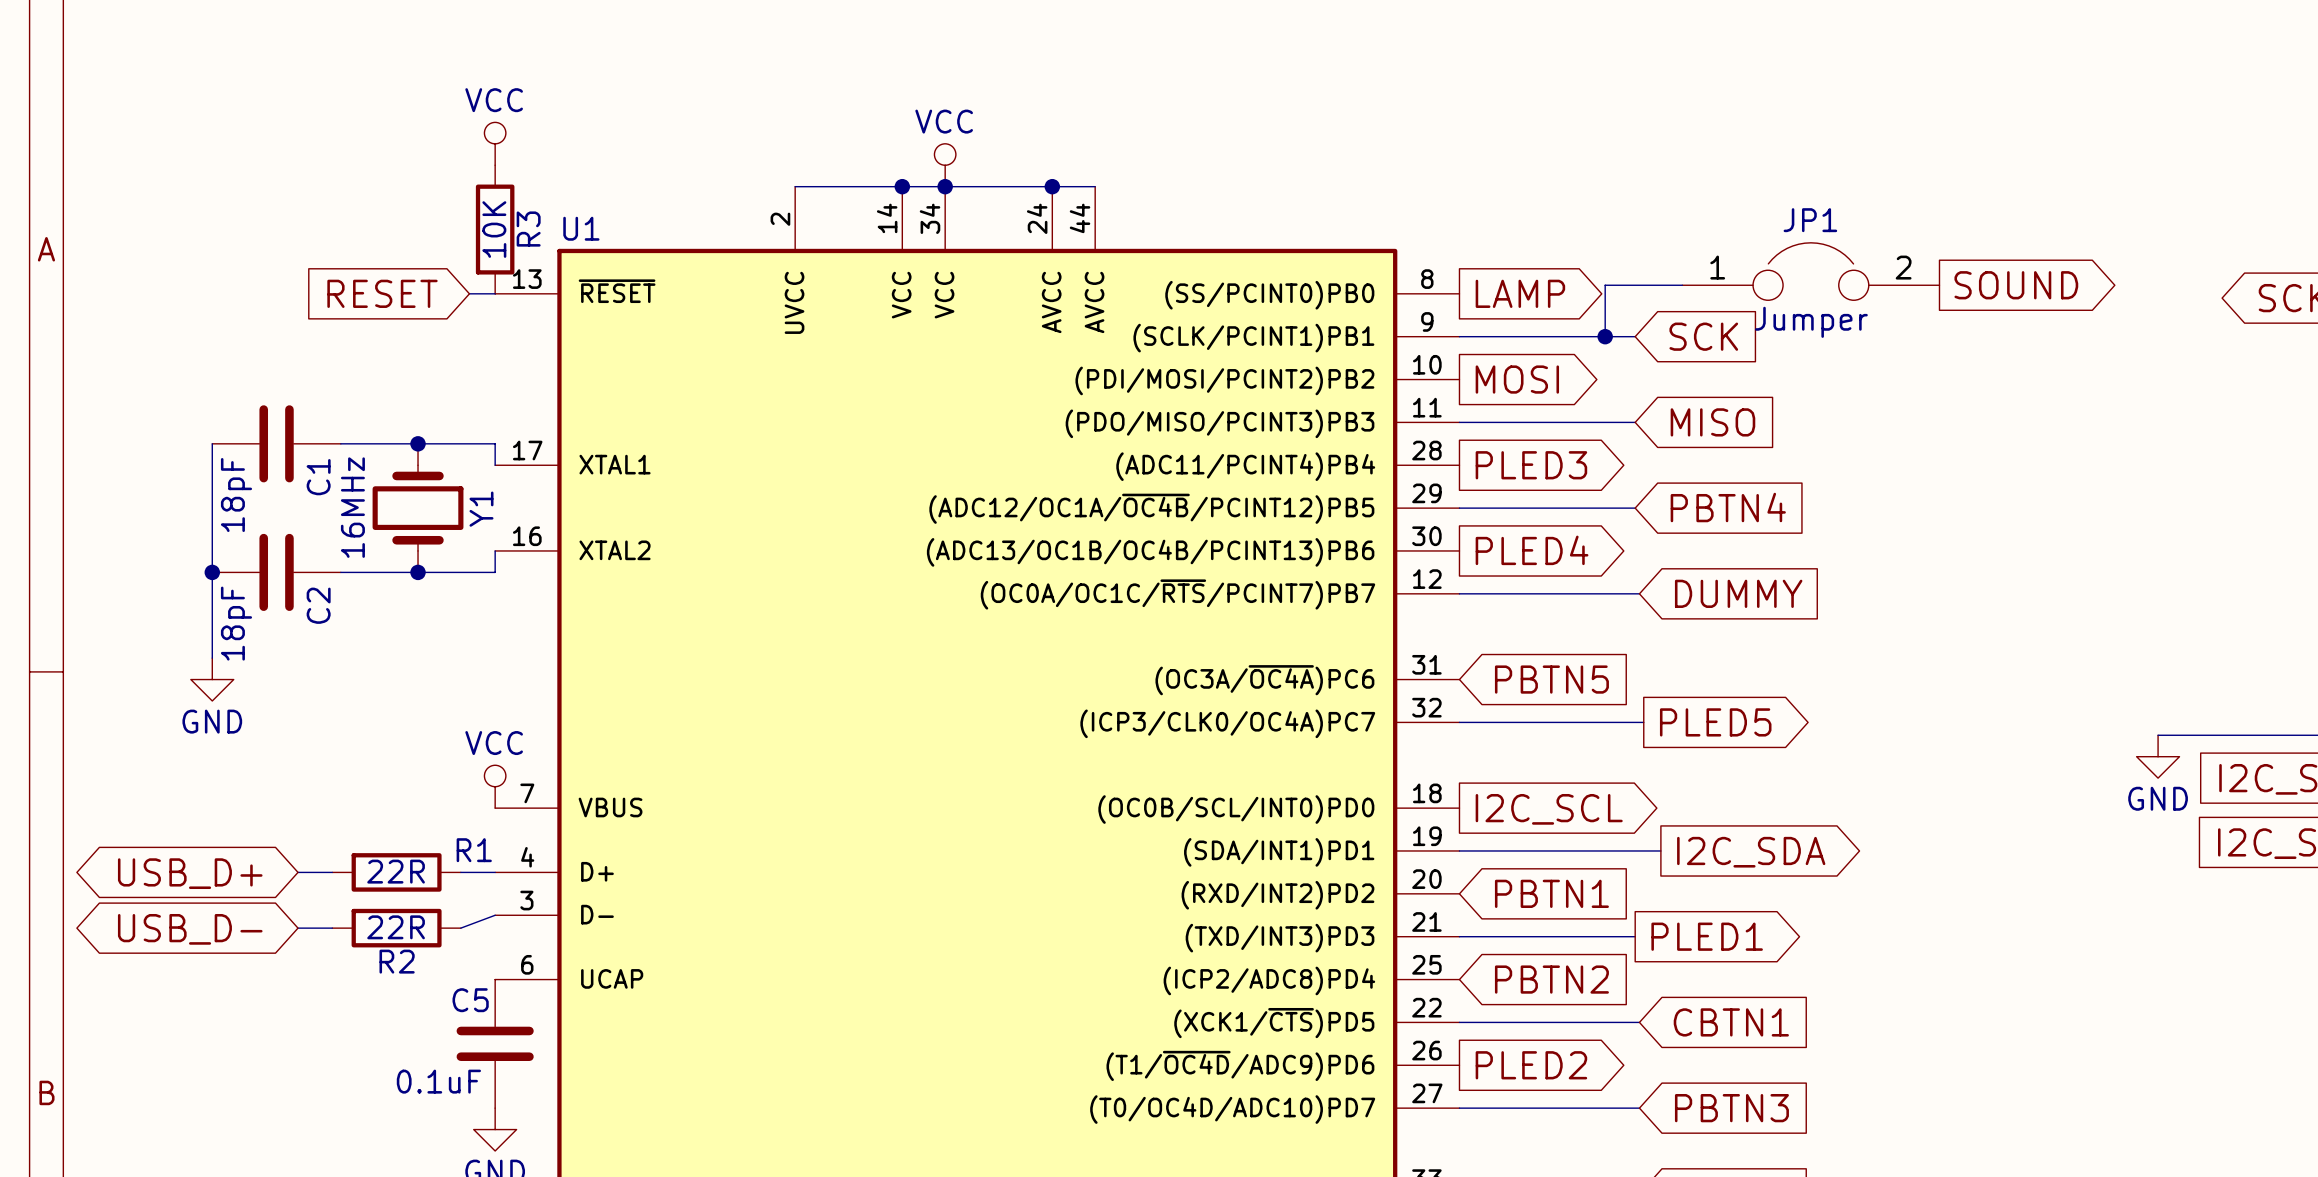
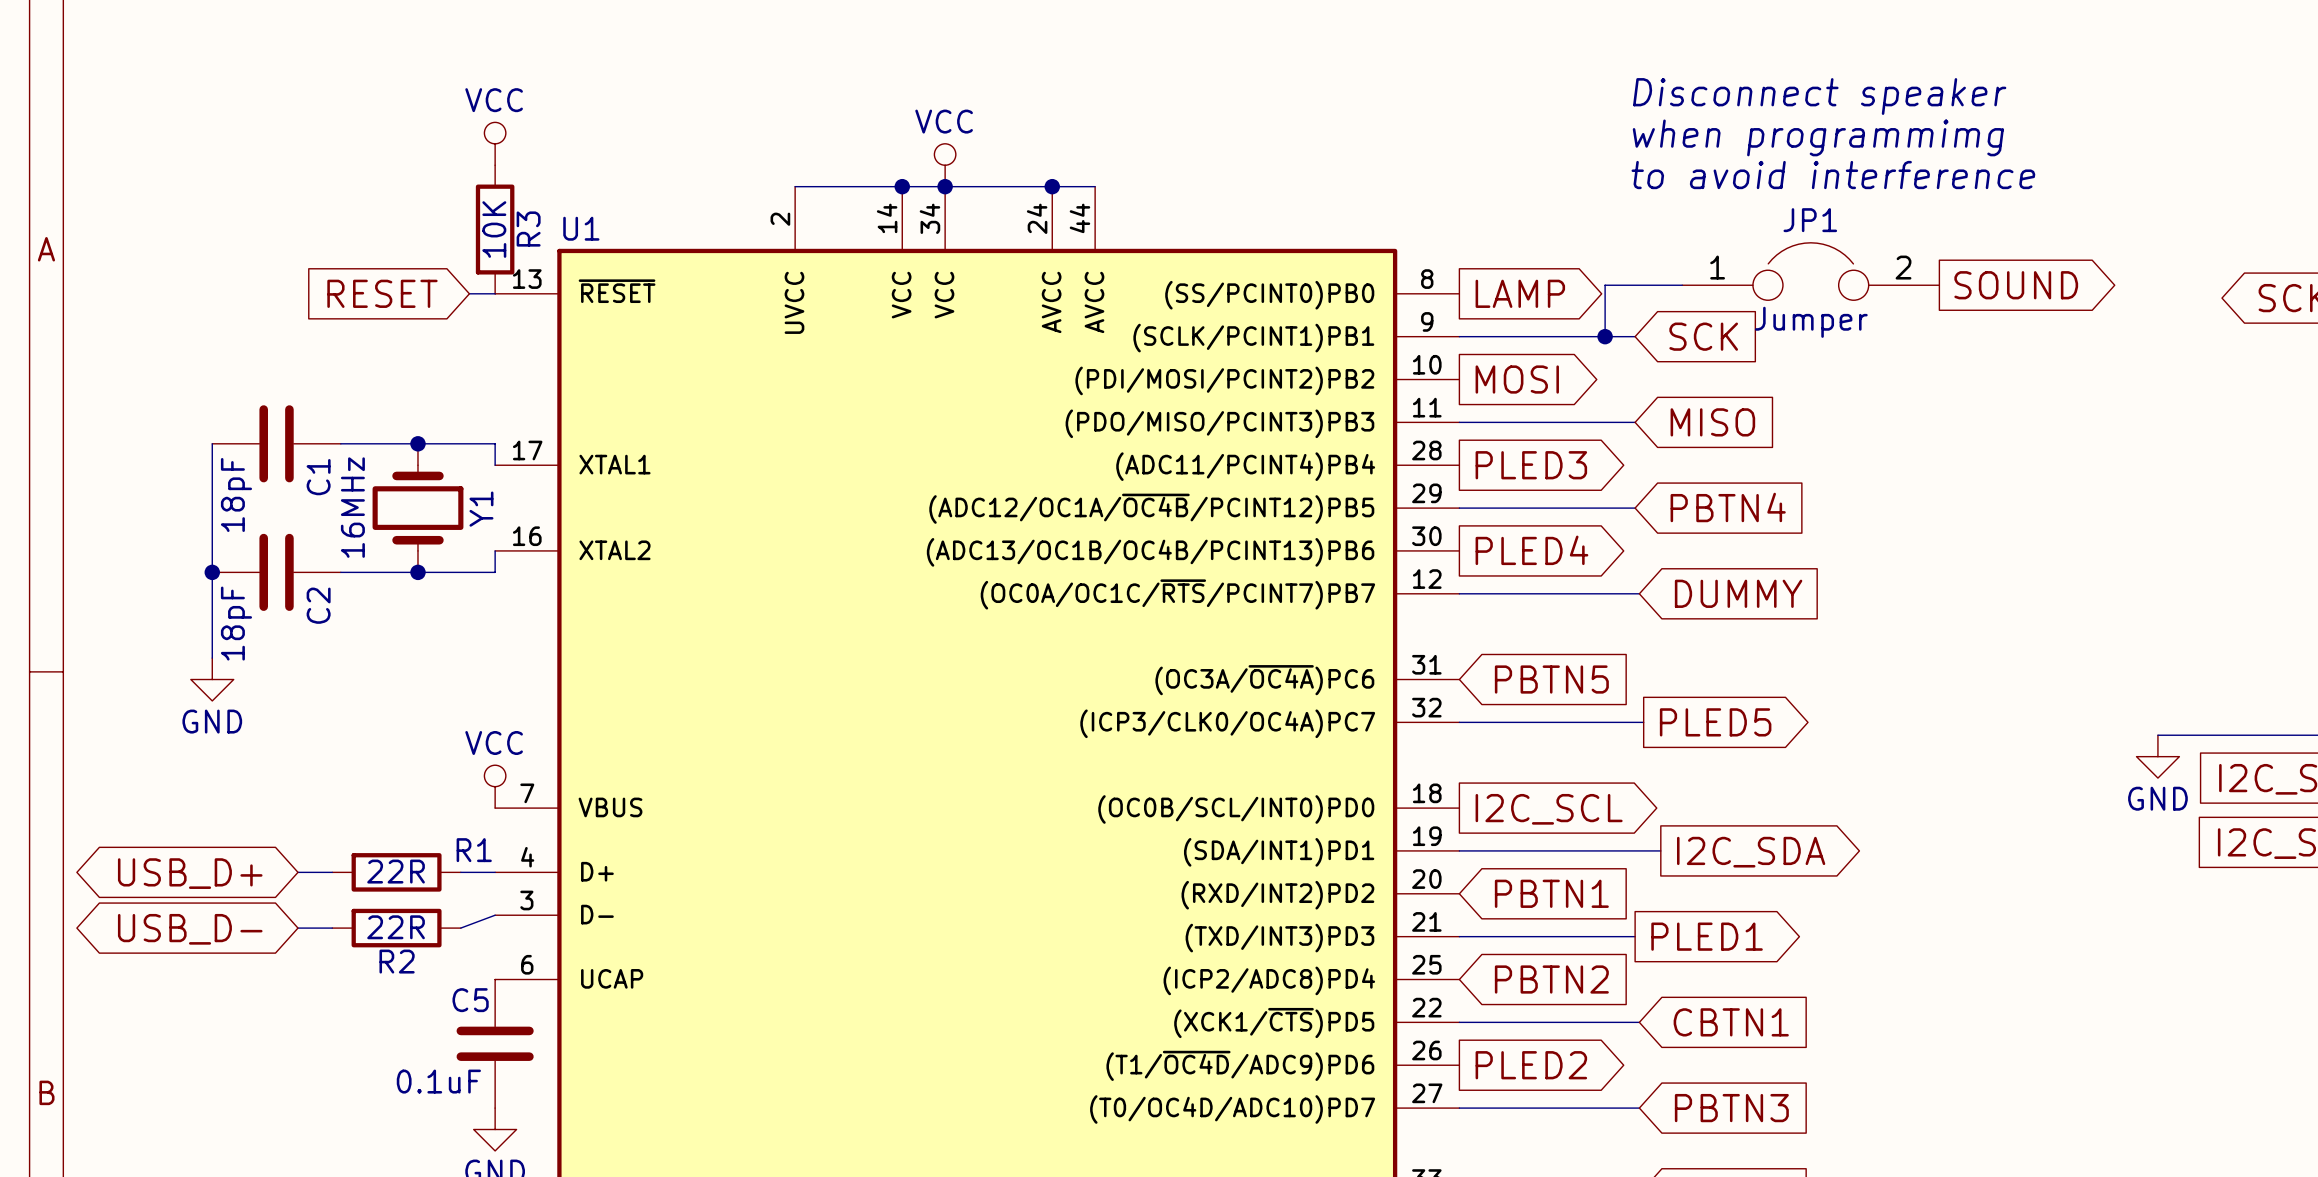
text: none -> Disconnect speaker (1819, 96)
text: none -> when programmimg (1818, 137)
text: none -> to avoid interference (1833, 175)

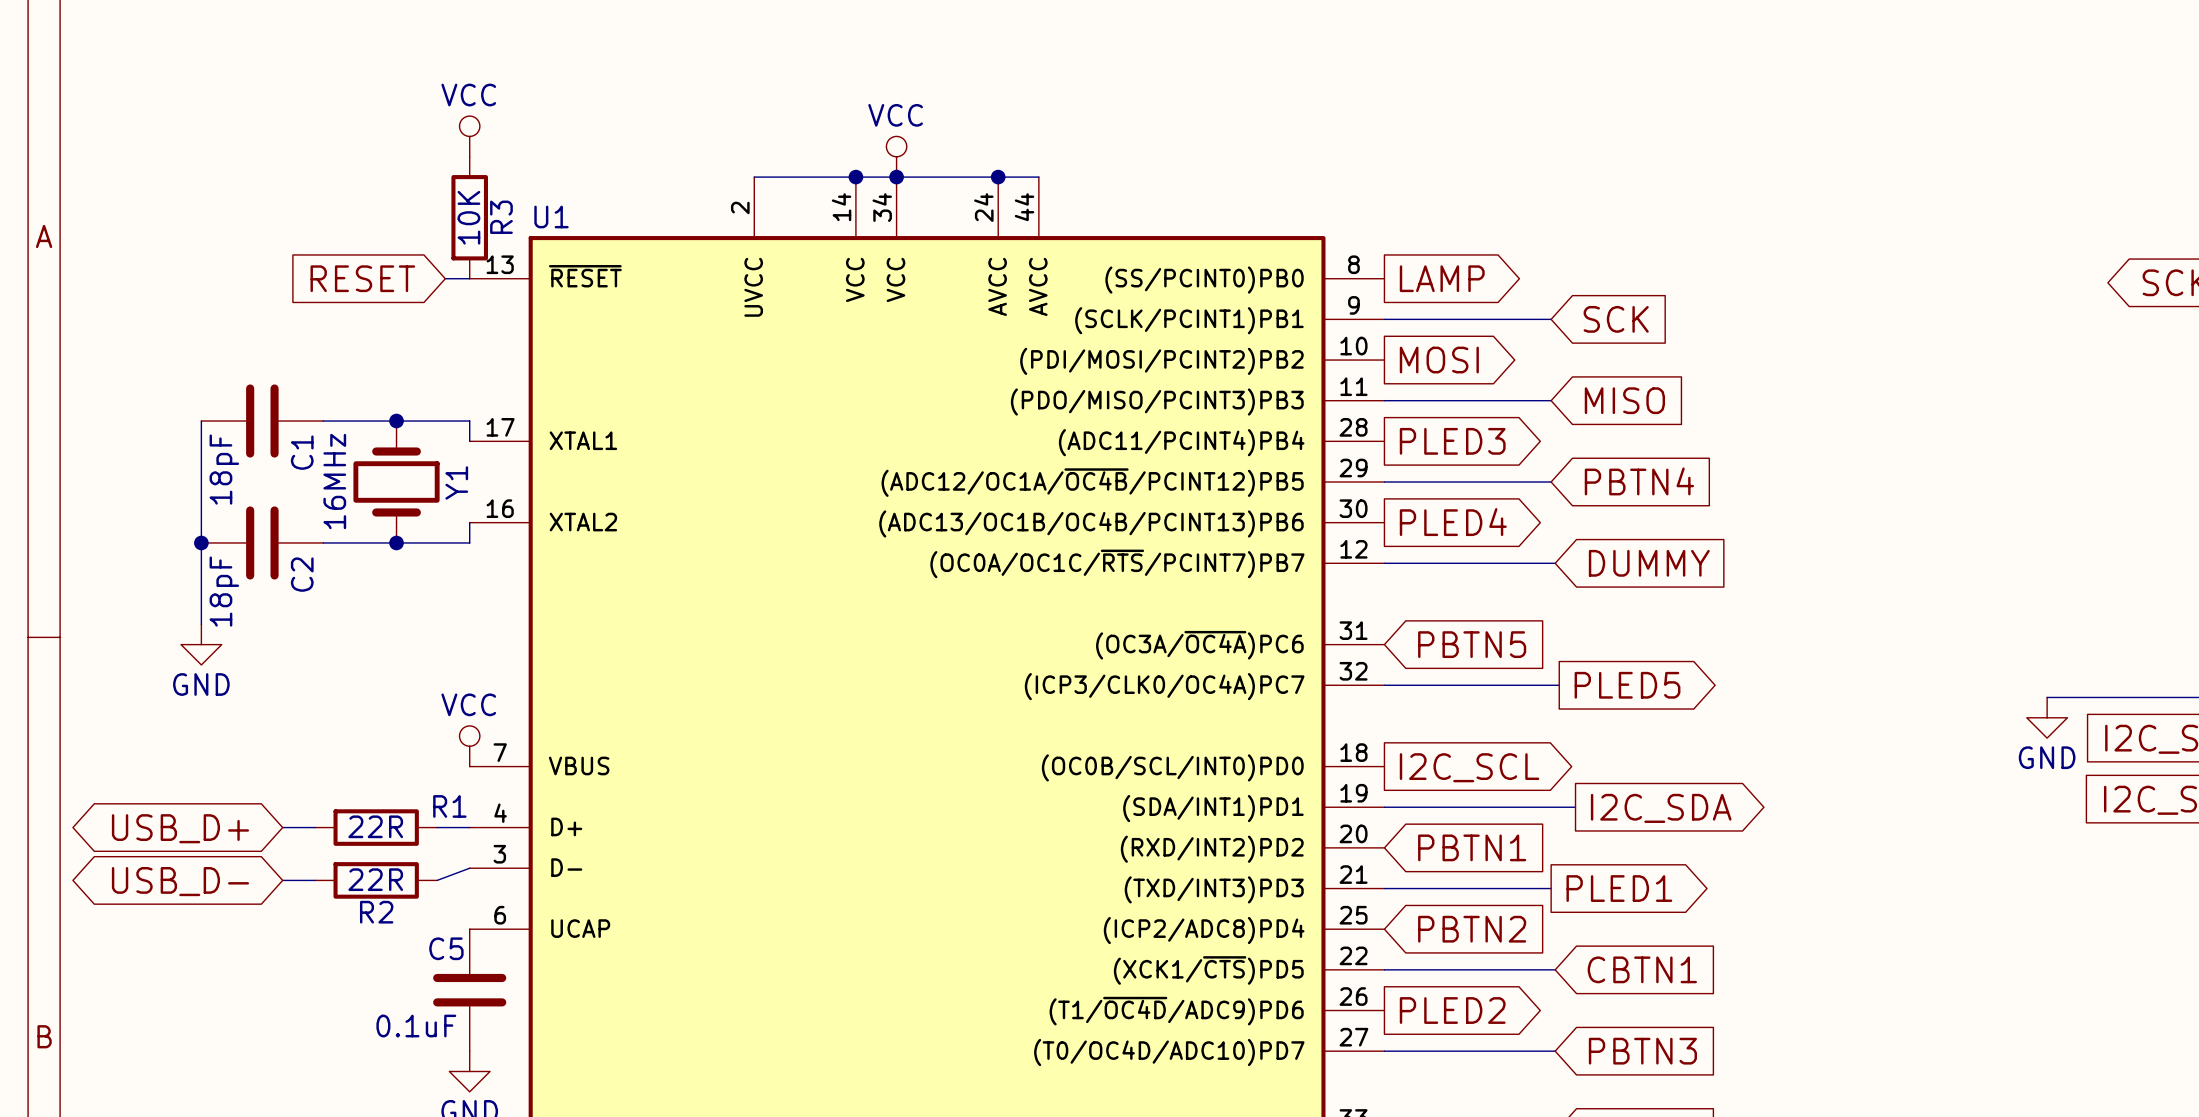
text: Disconnect speaker (1819, 96) -> none
text: when programmimg (1818, 137) -> none
text: to avoid interference (1833, 175) -> none
JP1: Jumper (1810, 271) -> none
wire: (1682, 285) (1605, 285) (1605, 336) -> none
global label: SOUND (2016, 285) -> none
junction: (1605, 336) -> none

